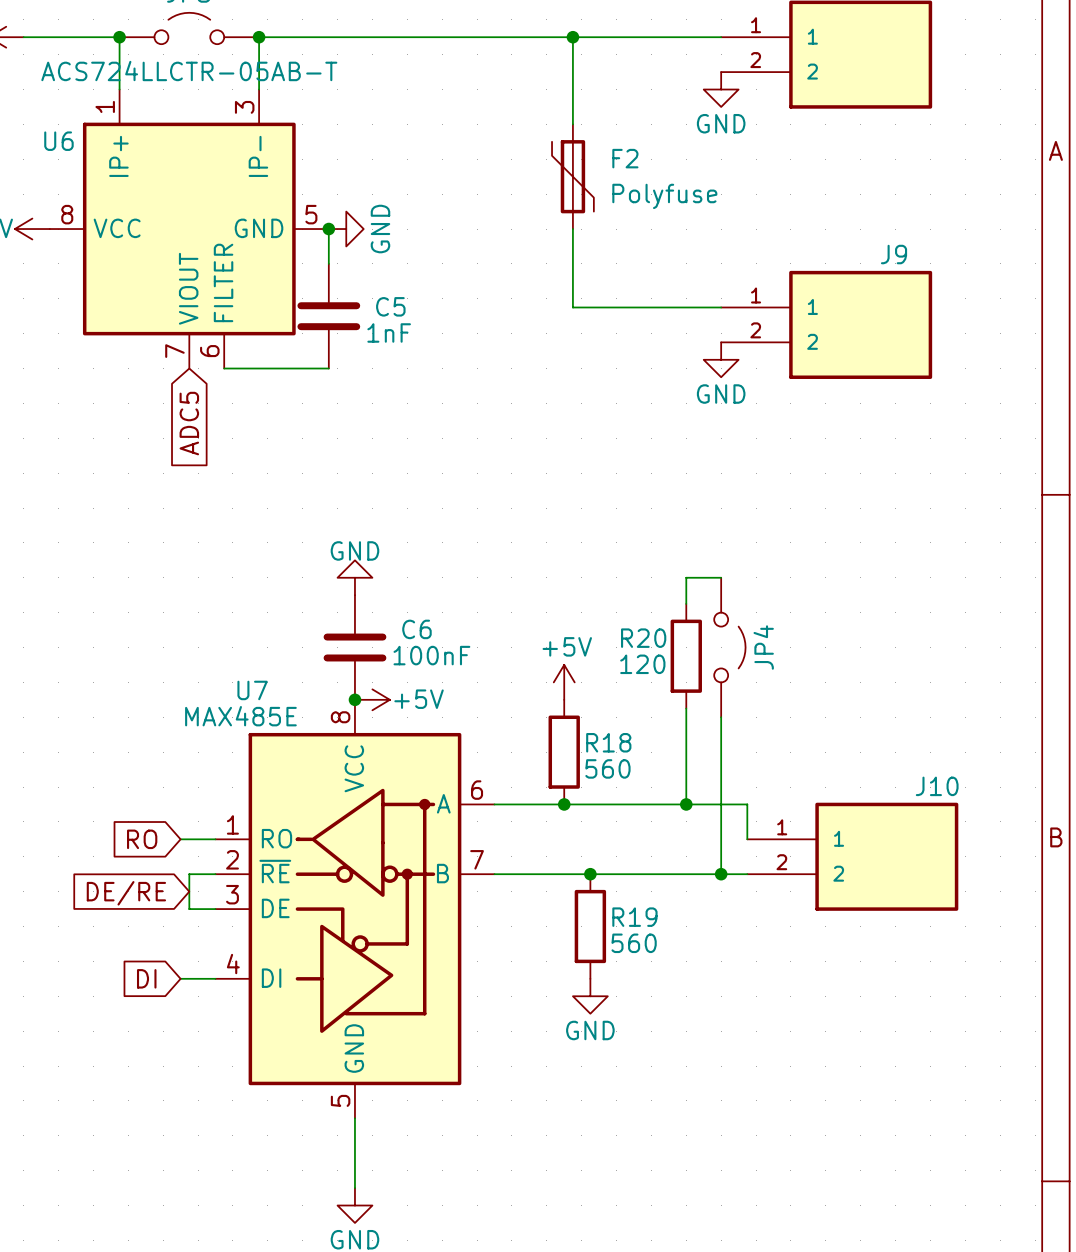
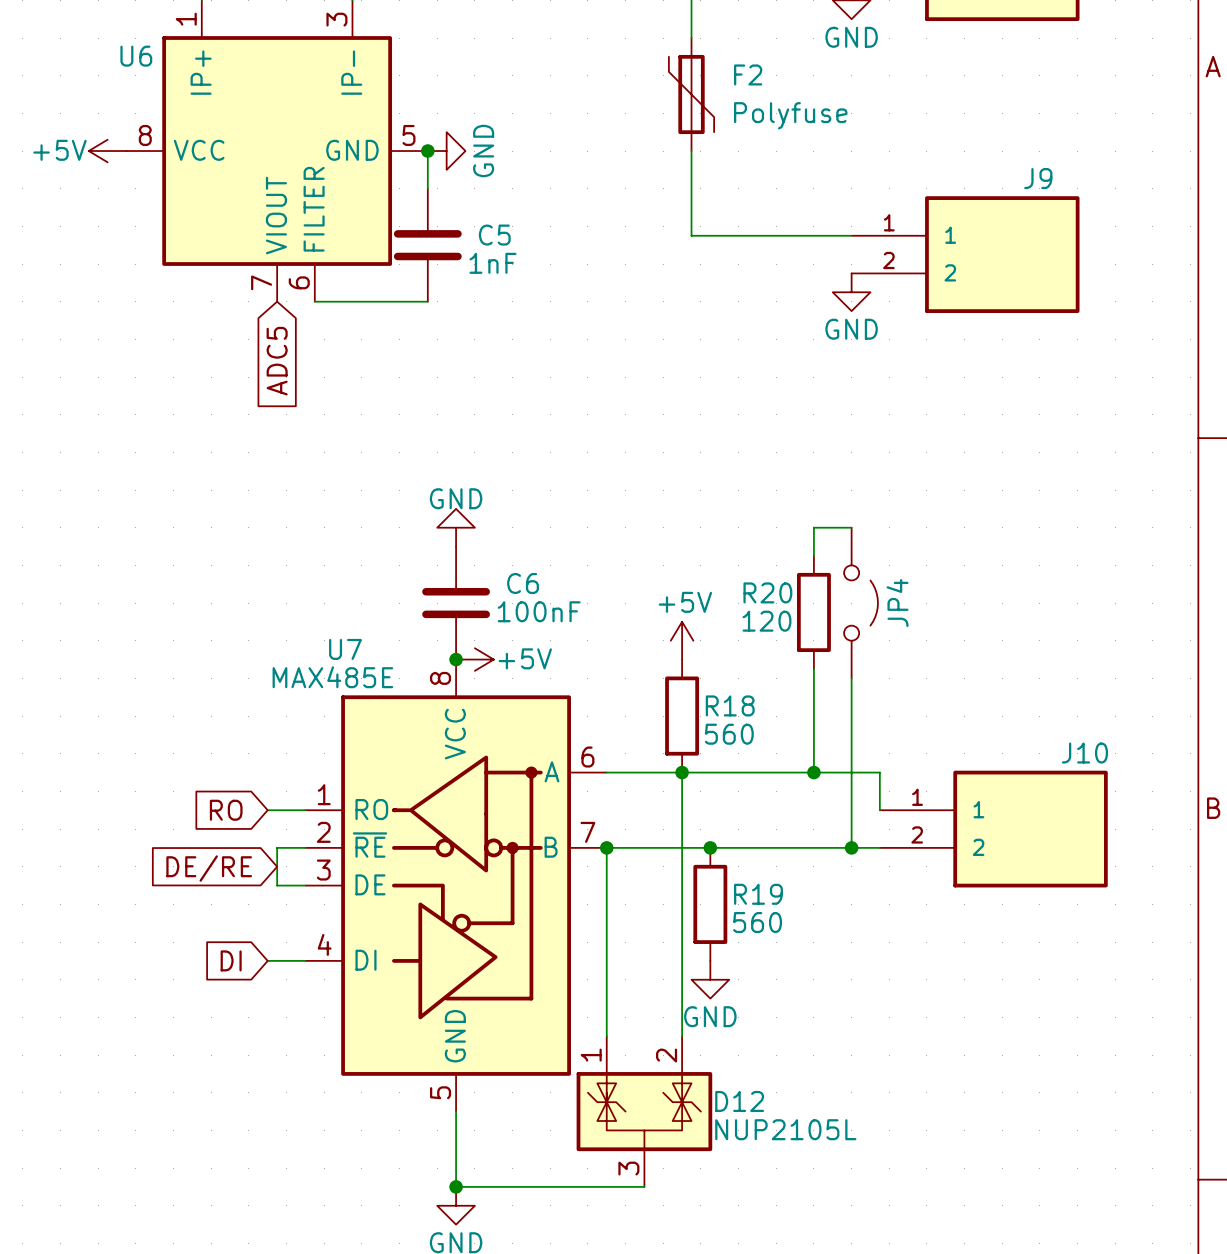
wire: none -> (682, 772) (682, 1036)
wire: none -> (606, 847) (606, 1036)
junction: none -> (606, 847)
D12: none -> NUP2105L (644, 1111)
wire: none -> (456, 1186) (644, 1186)
junction: none -> (456, 1186)

